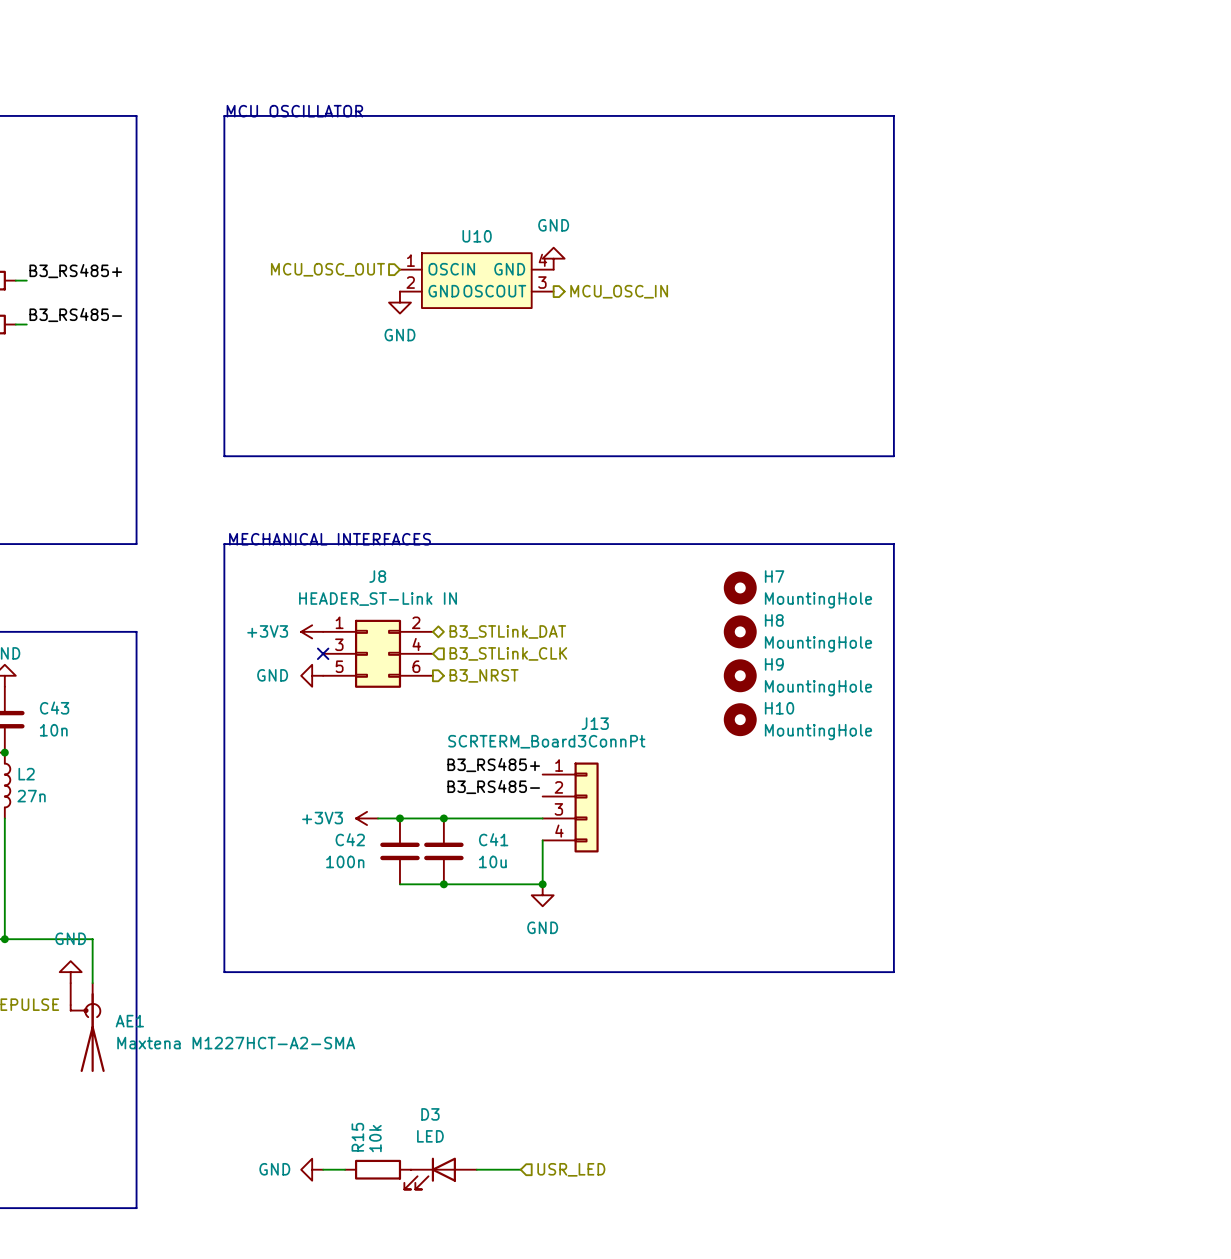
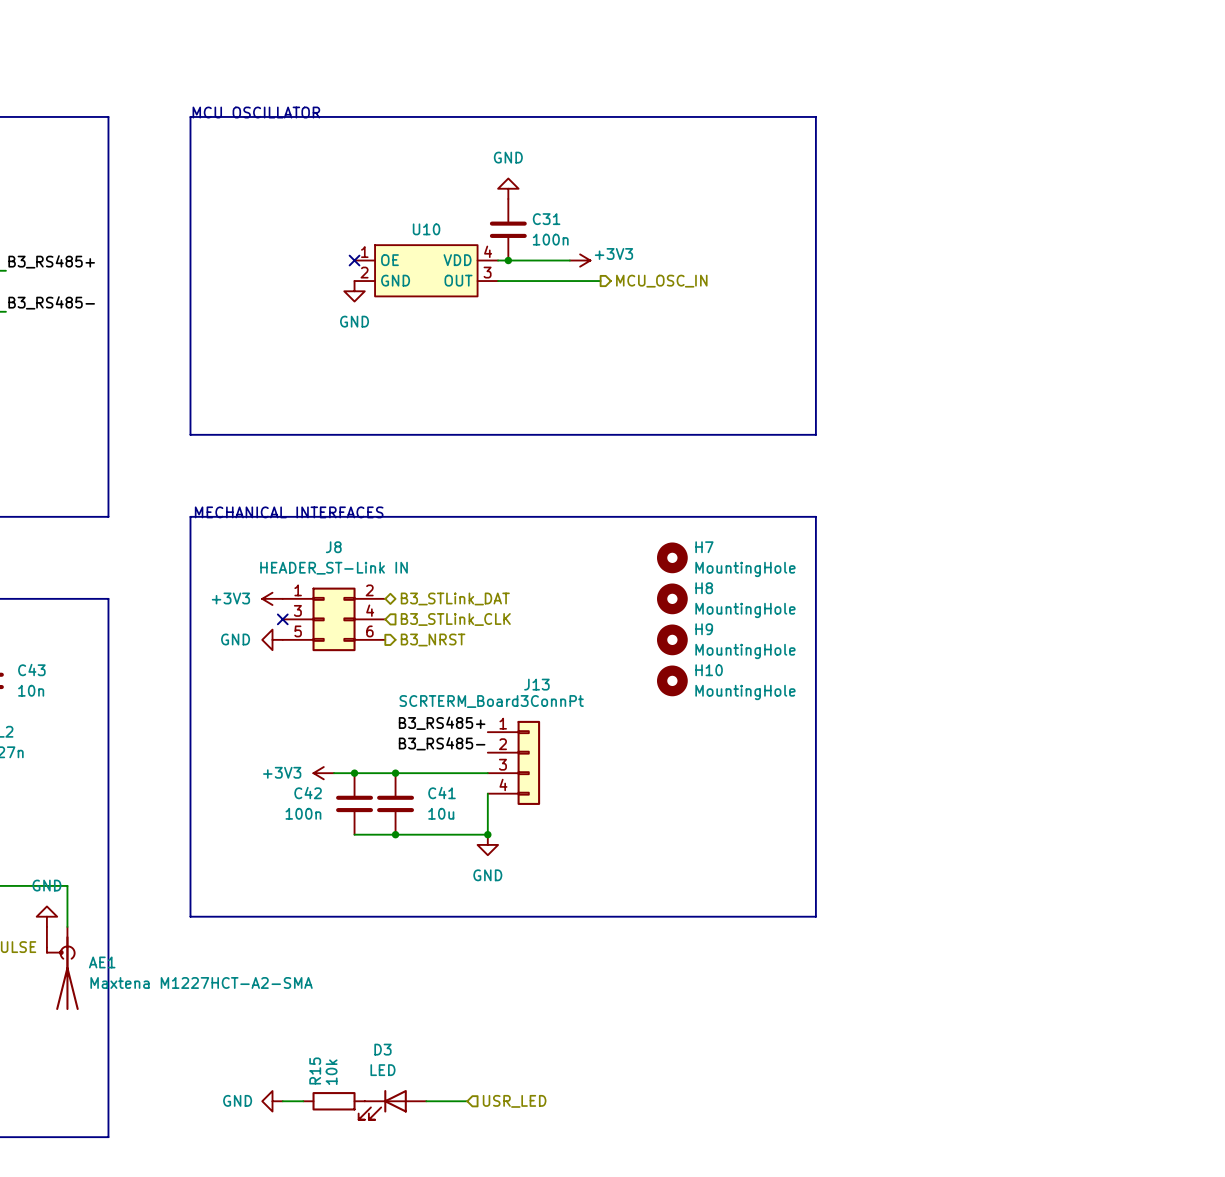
C31: none -> 100n (508, 229)
power symbol position: GND (553, 258) -> GND (508, 188)
hierarchical label: MCU_OSC_OUT (327, 269) -> none
no-connect mark: none -> (354, 260)
U10 pin name: OSCIN (451, 269) -> OE (389, 260)
U10 pin name: GND (509, 269) -> VDD (457, 260)
wire: none -> (498, 260) (569, 260)
junction: none -> (508, 260)
power symbol: none -> +3V3 (580, 260)
U10 pin name: OSCOUT (494, 291) -> OUT (458, 280)
wire: none -> (498, 281) (600, 281)
hierarchical label position: MCU_OSC_IN (619, 291) -> MCU_OSC_IN (661, 281)

